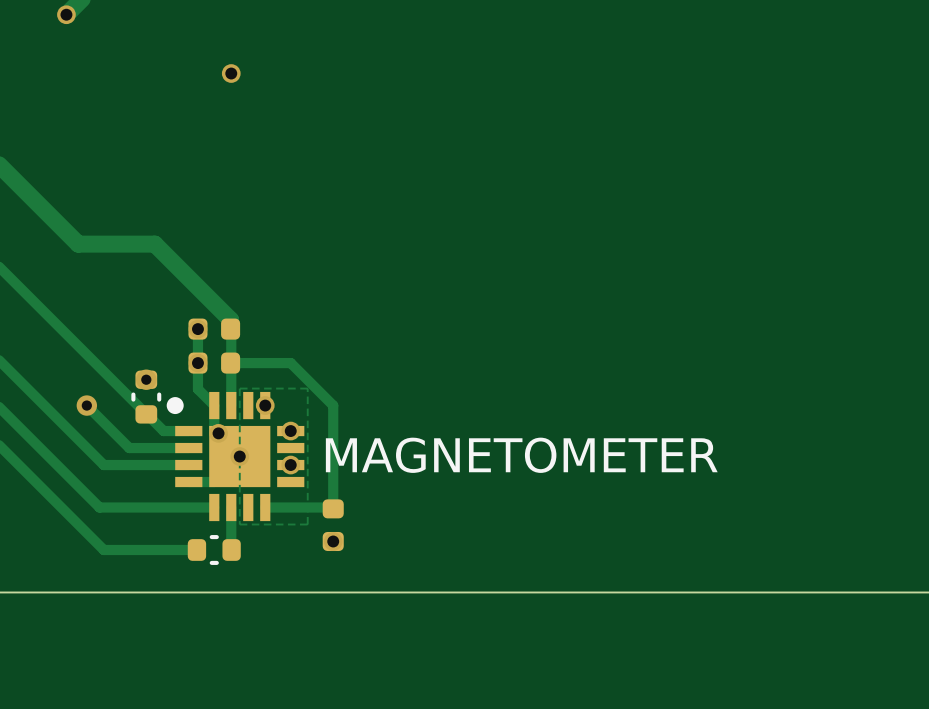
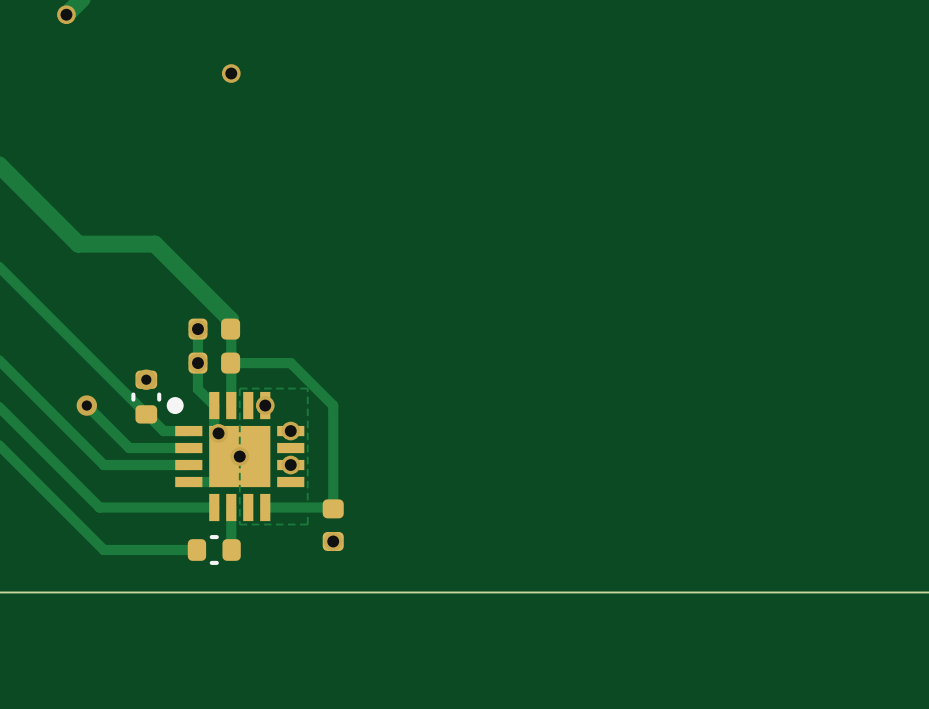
part value: MAGNETOMETER (521, 455) -> none

